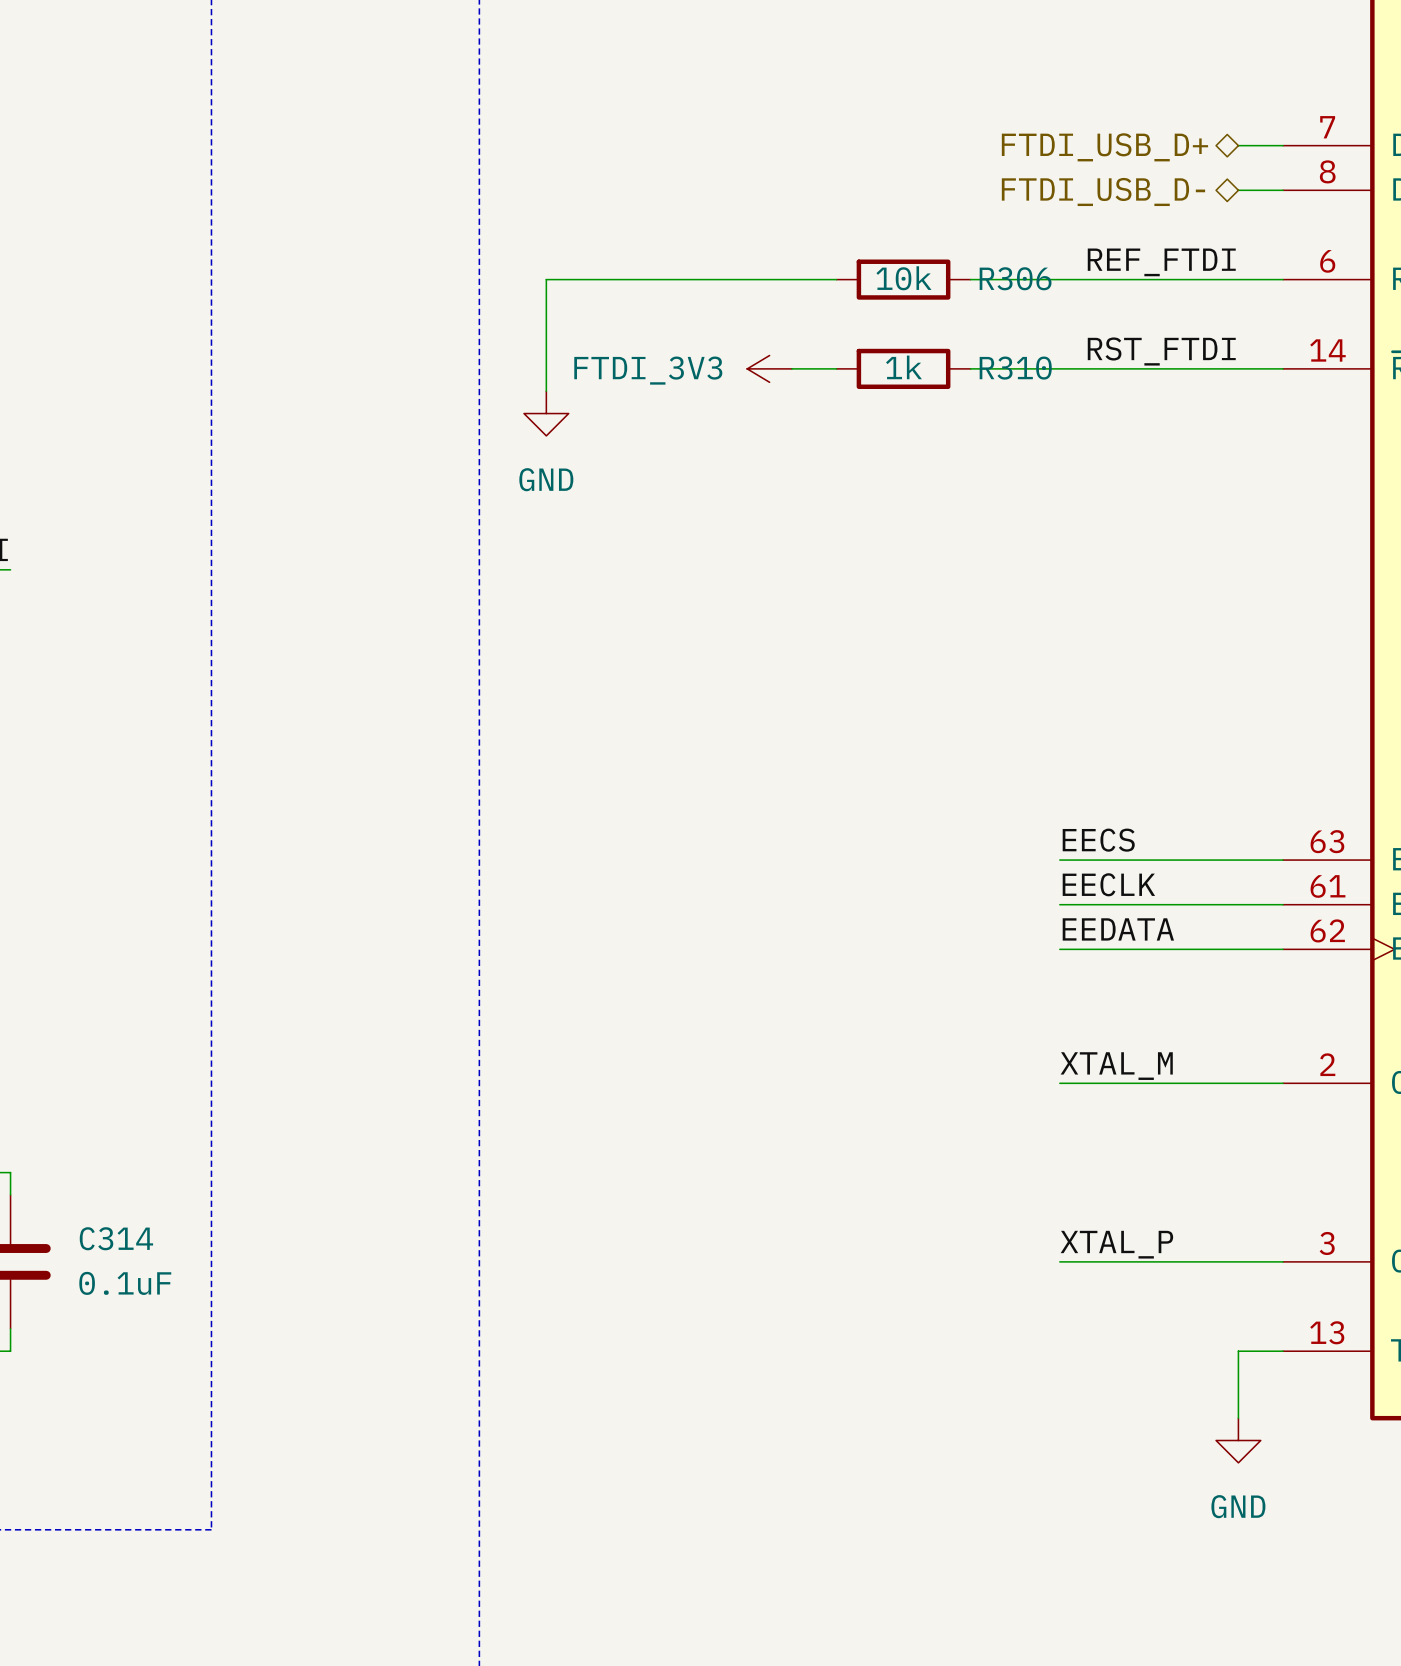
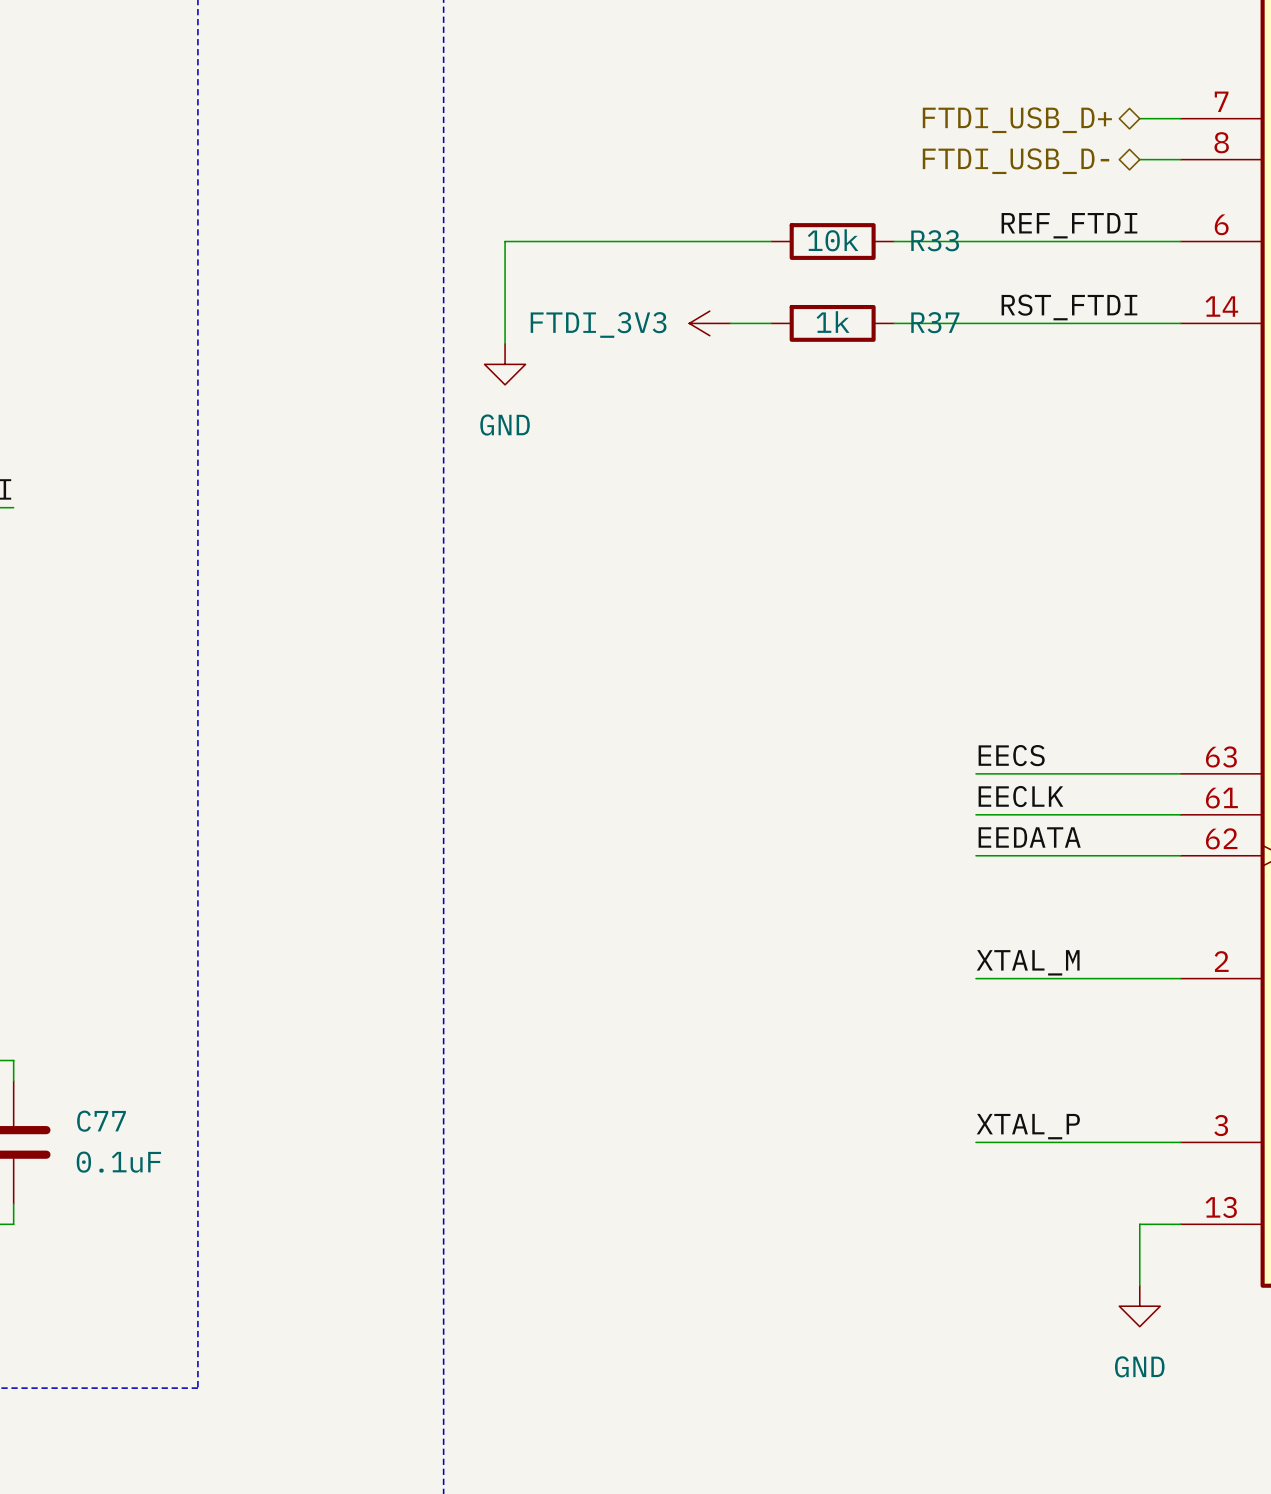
R306 name: R306 (1015, 278) -> R33 (935, 240)
R310 name: R310 (1015, 368) -> R37 (935, 322)
C314 name: C314 (116, 1238) -> C77 (101, 1121)

